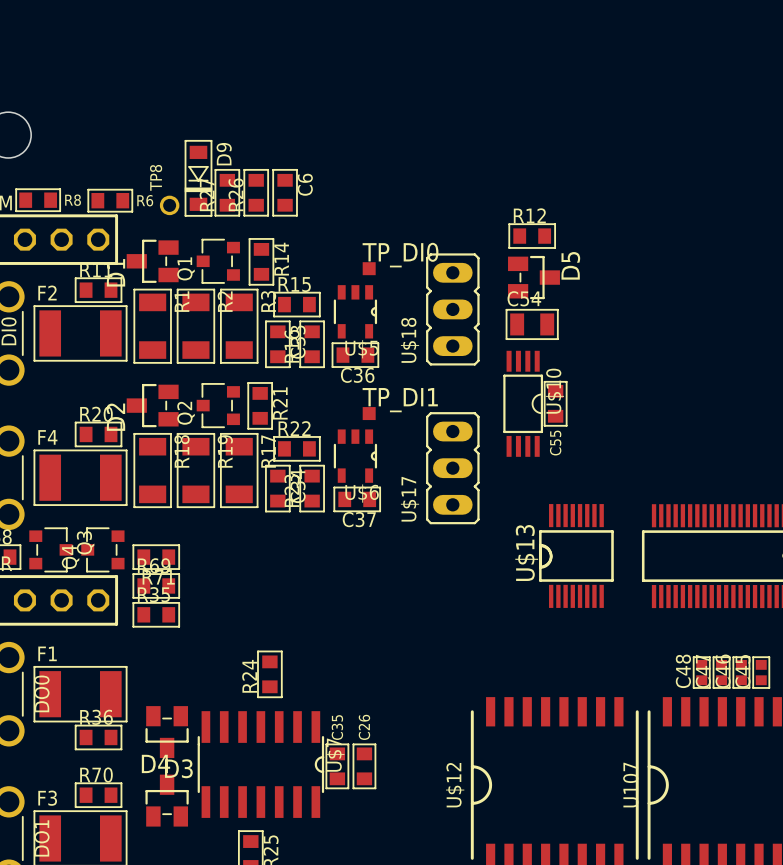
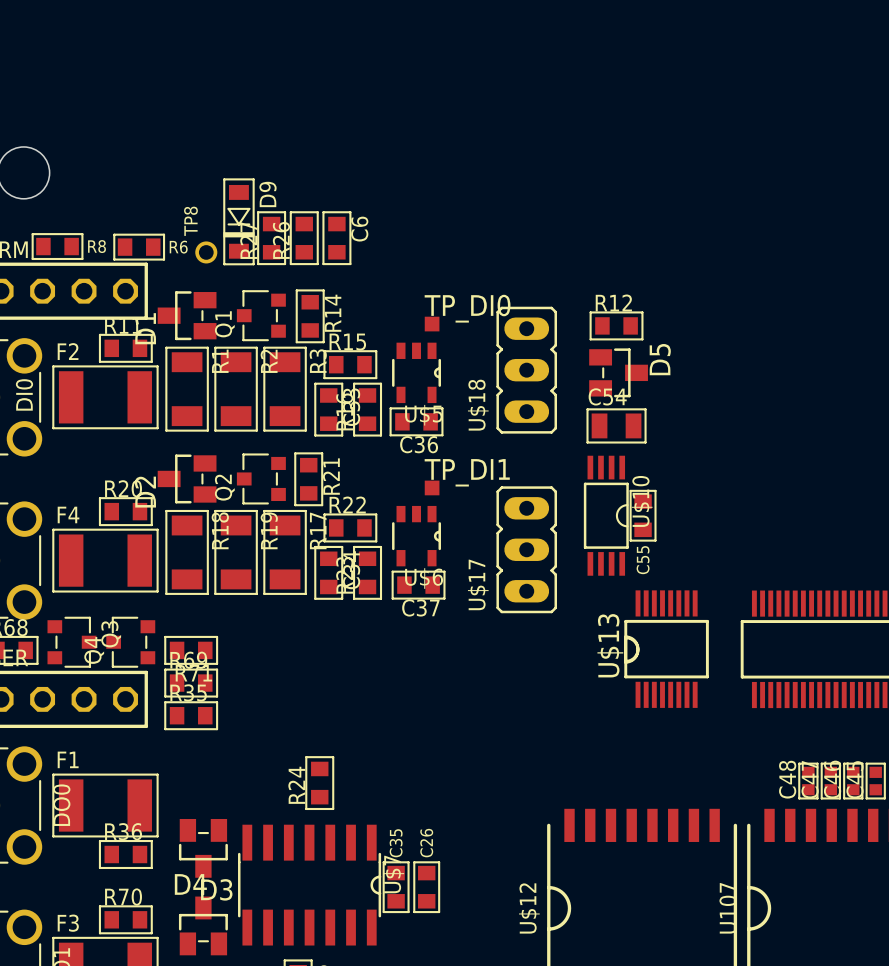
R12 position: (532, 236) -> (616, 325)
D5 position: (533, 277) -> (618, 372)
C54 position: (532, 324) -> (616, 425)
U$10 position: (523, 403) -> (606, 515)
C55 position: (555, 403) -> (643, 515)

